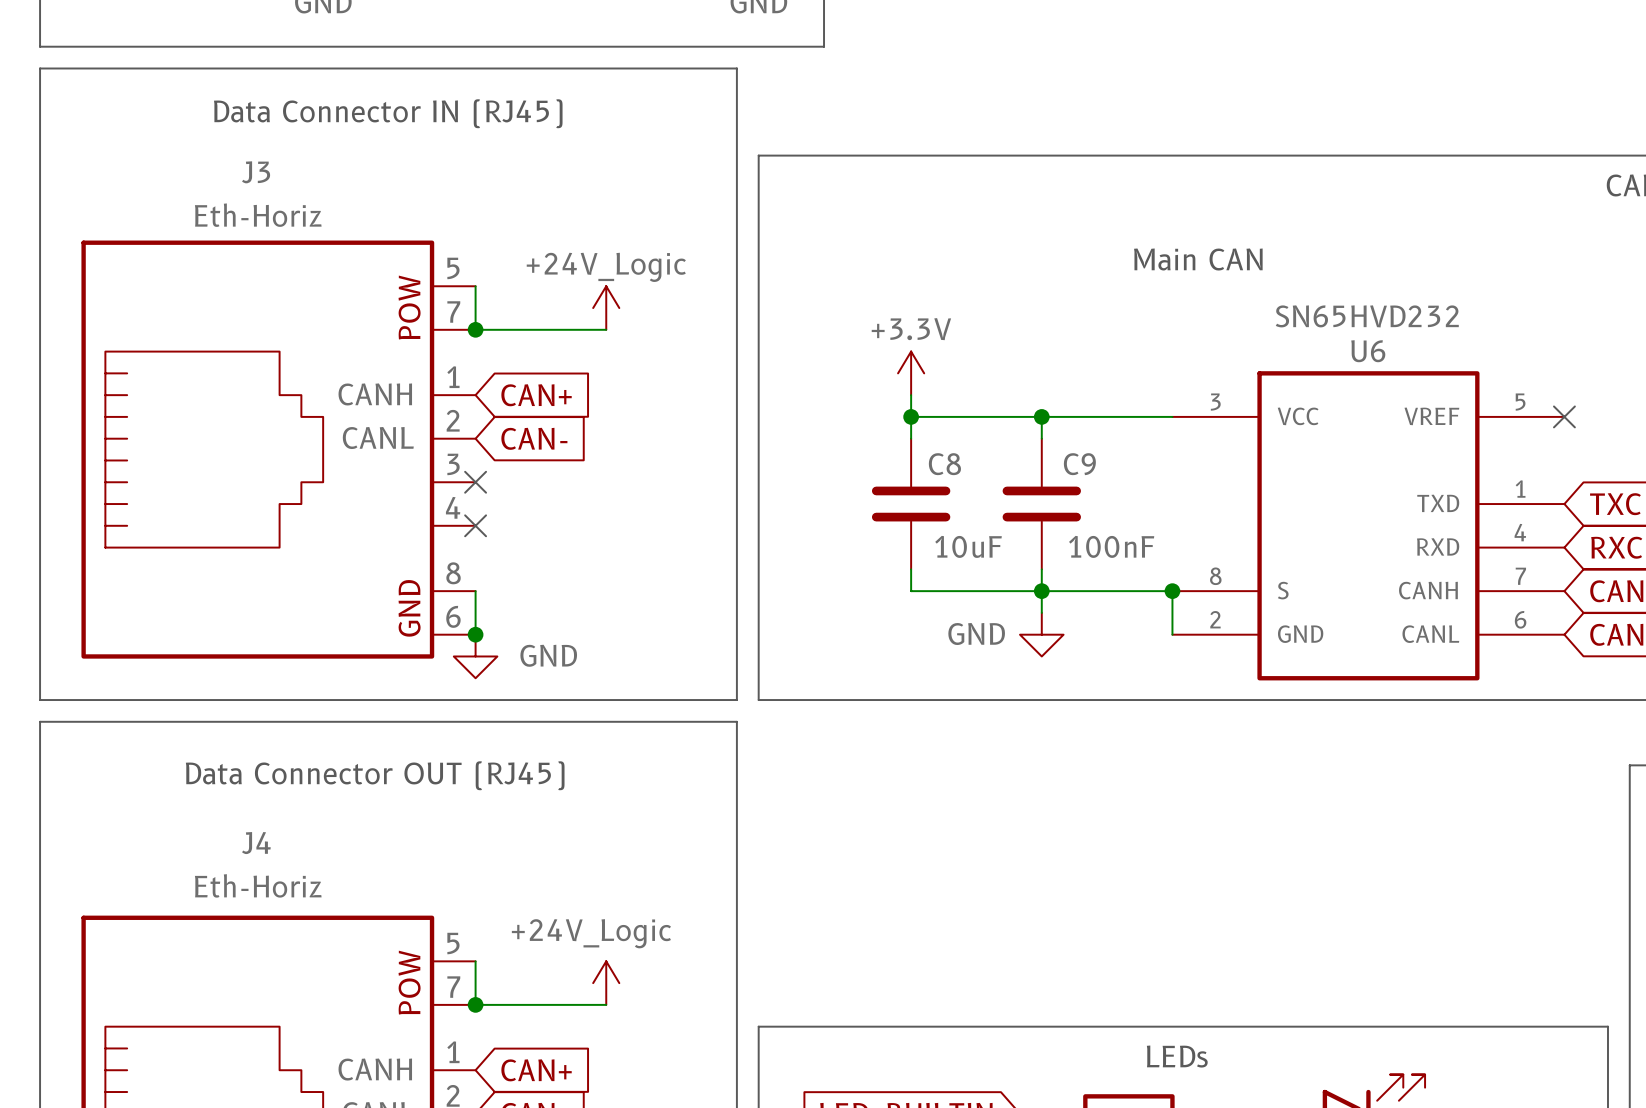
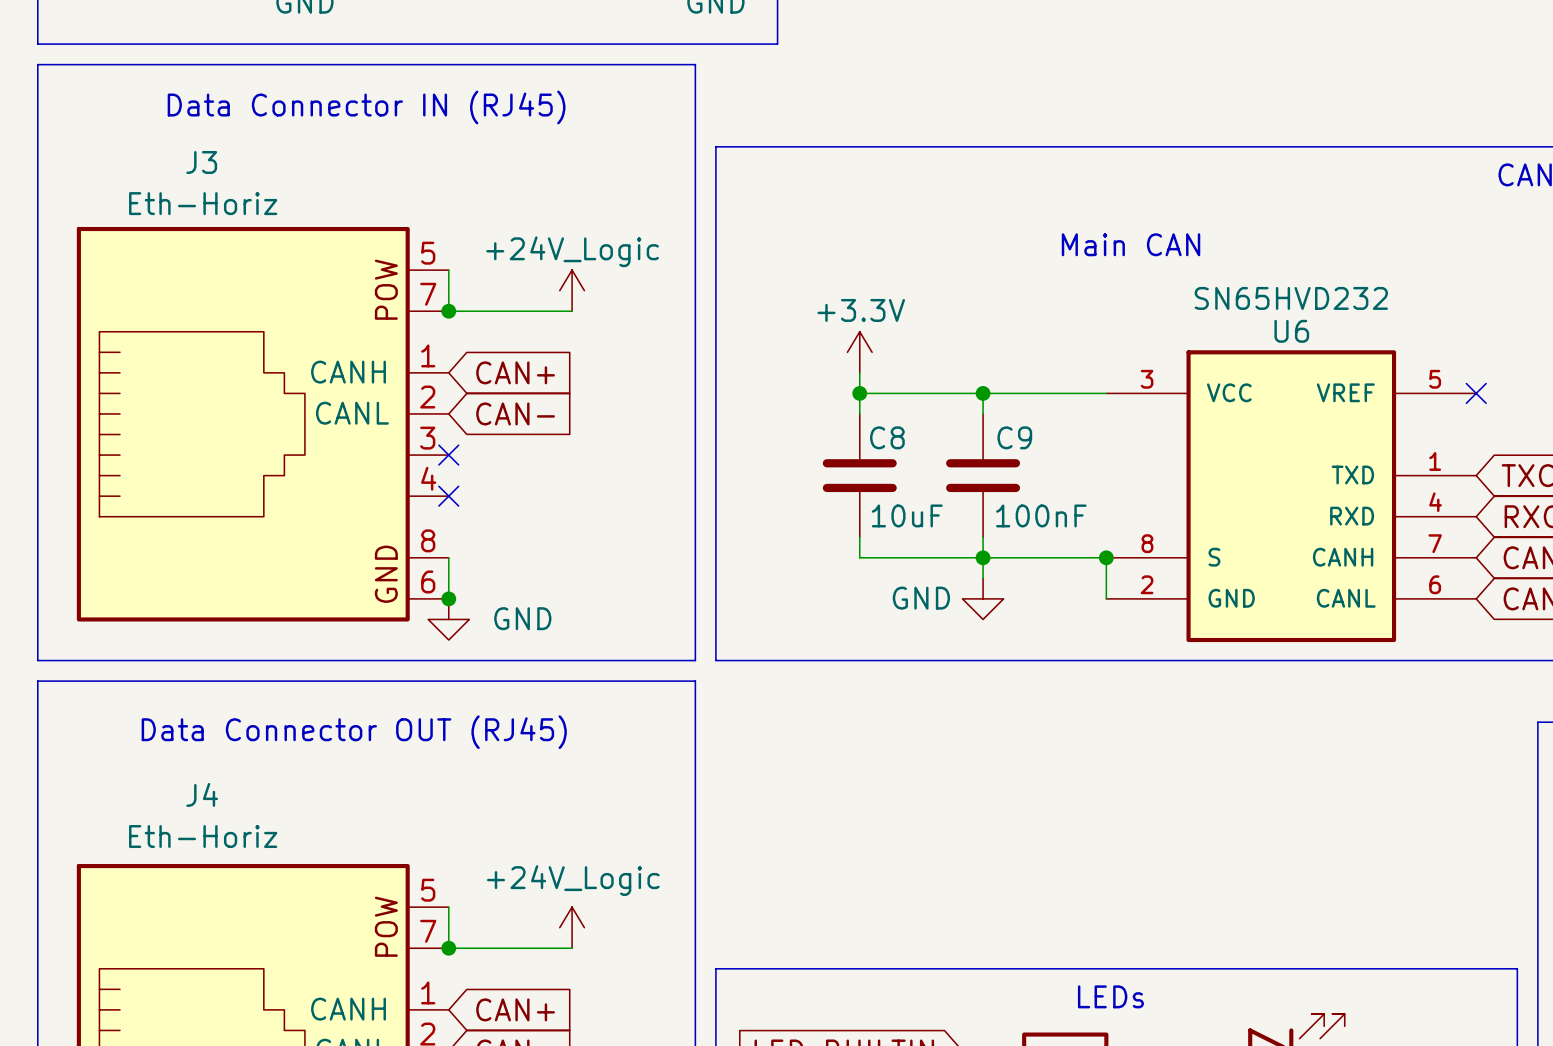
J3 name position: J3 (256, 172) -> J3 (201, 162)
J3 value position: Eth-Horiz (258, 215) -> Eth-Horiz (203, 203)
J4 name position: J4 (256, 843) -> J4 (202, 794)
J4 value position: Eth-Horiz (258, 885) -> Eth-Horiz (203, 836)

